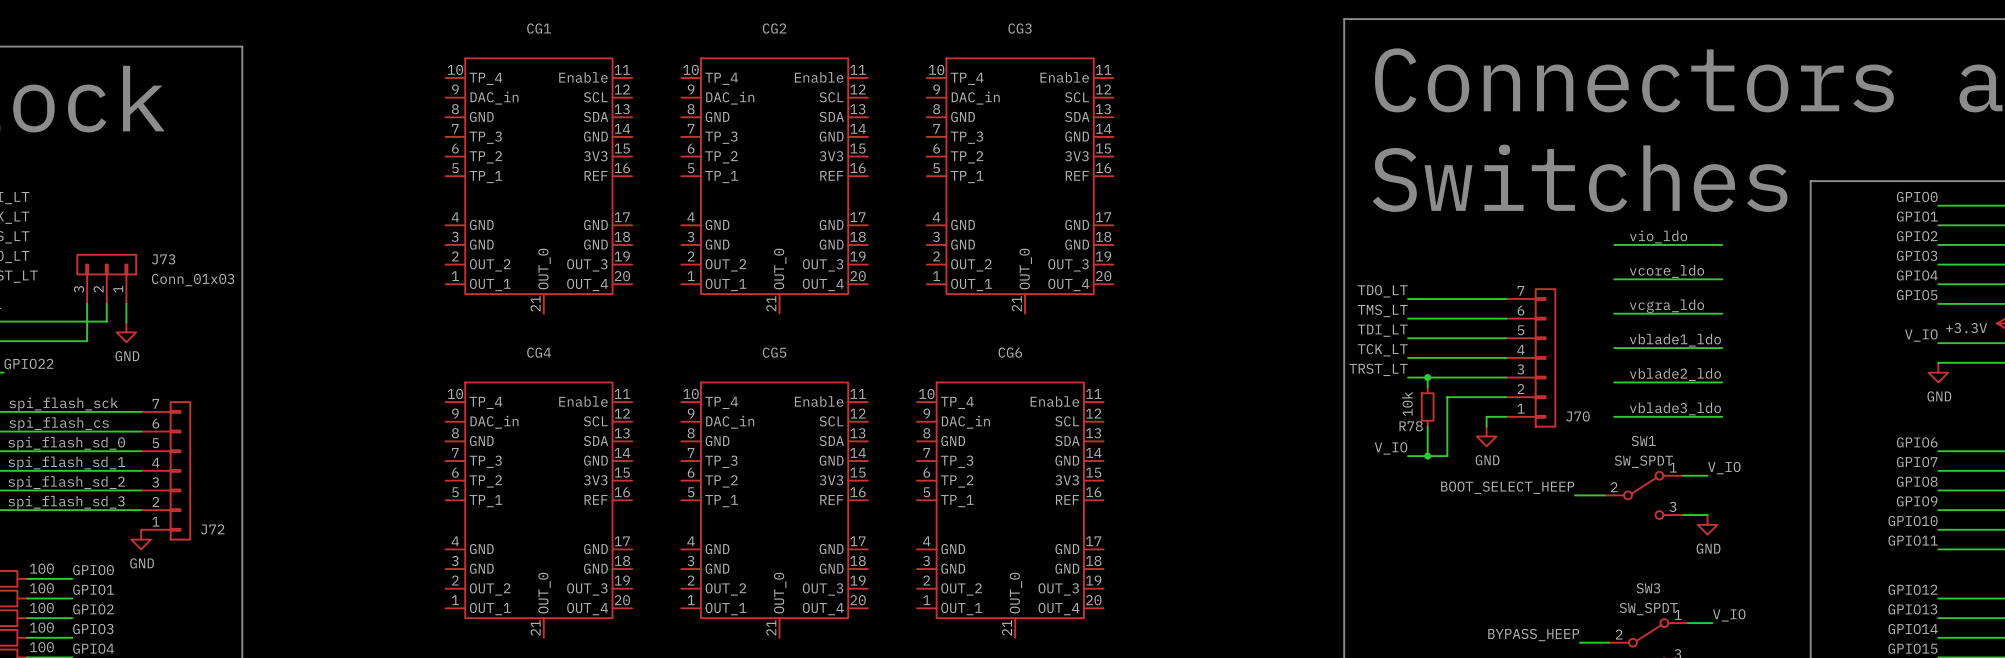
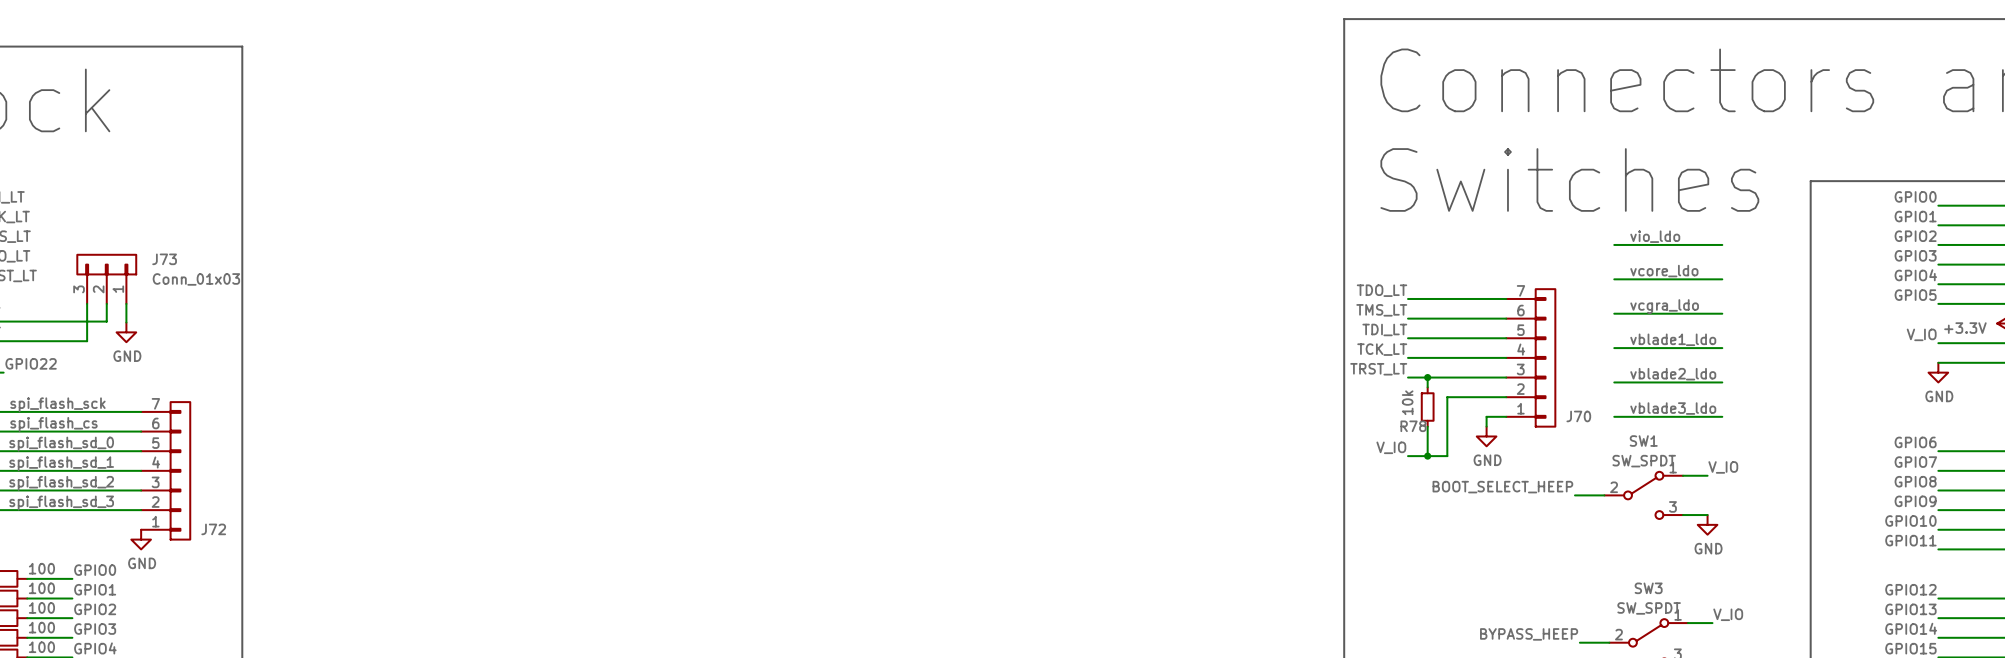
CG1: (538, 186) -> none
CG2: (774, 186) -> none
CG3: (1020, 186) -> none
CG4: (538, 510) -> none
CG5: (774, 510) -> none
CG6: (1010, 510) -> none

